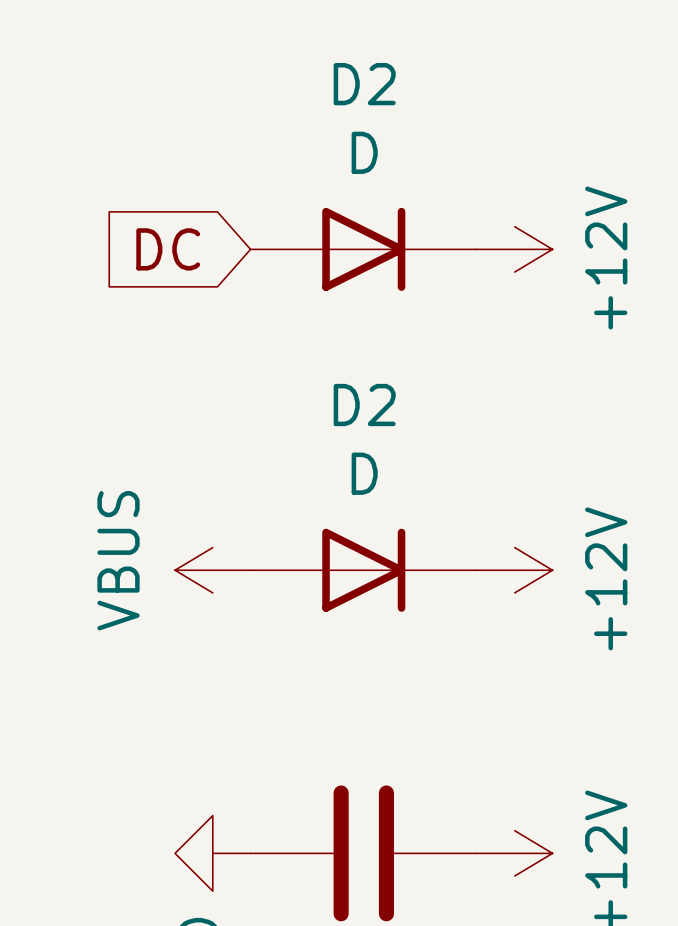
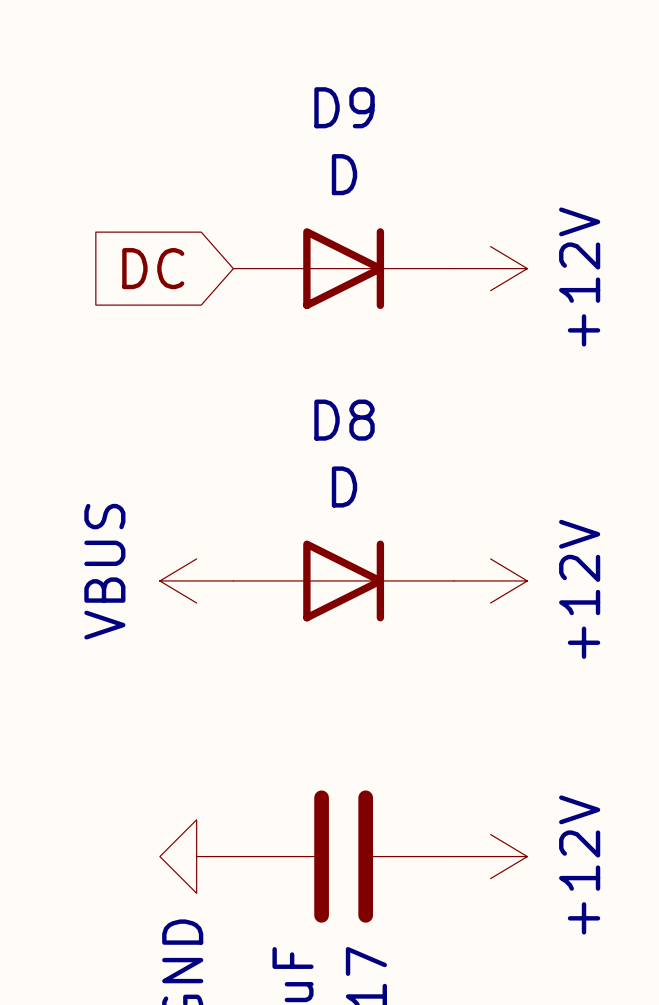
D2 name: D2 (364, 84) -> D9 (344, 107)
D2 name: D2 (364, 405) -> D8 (344, 420)

